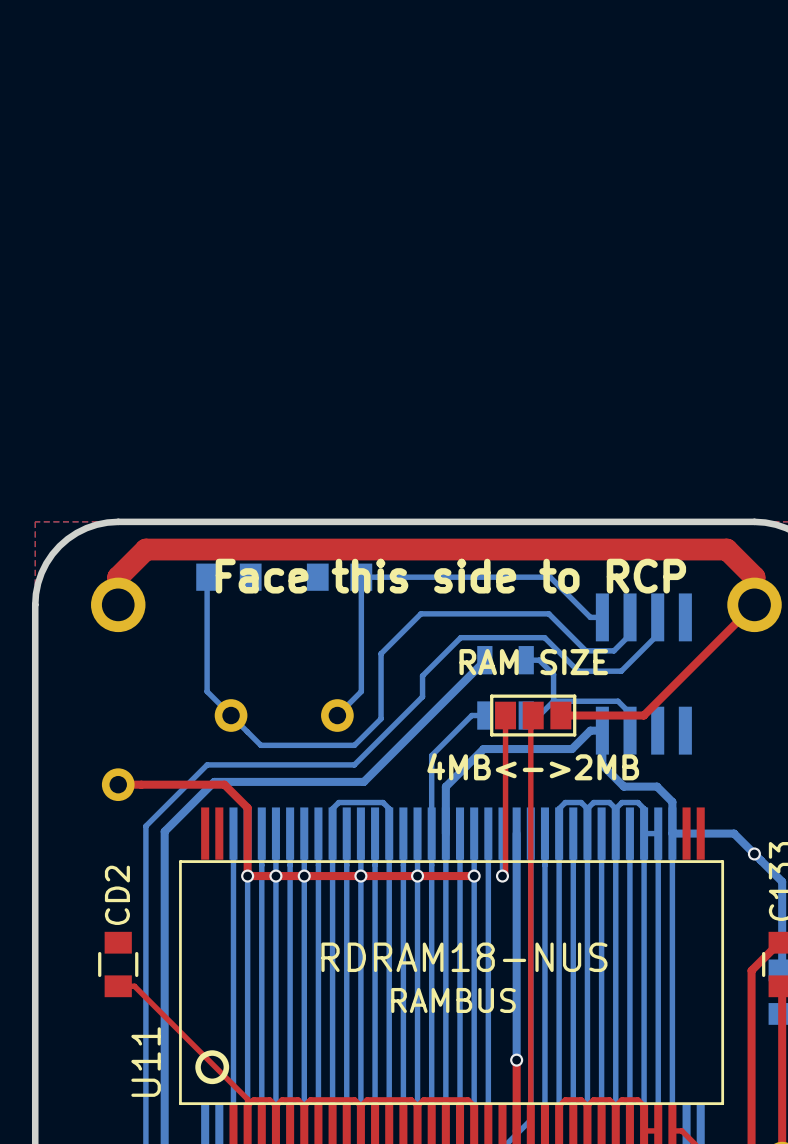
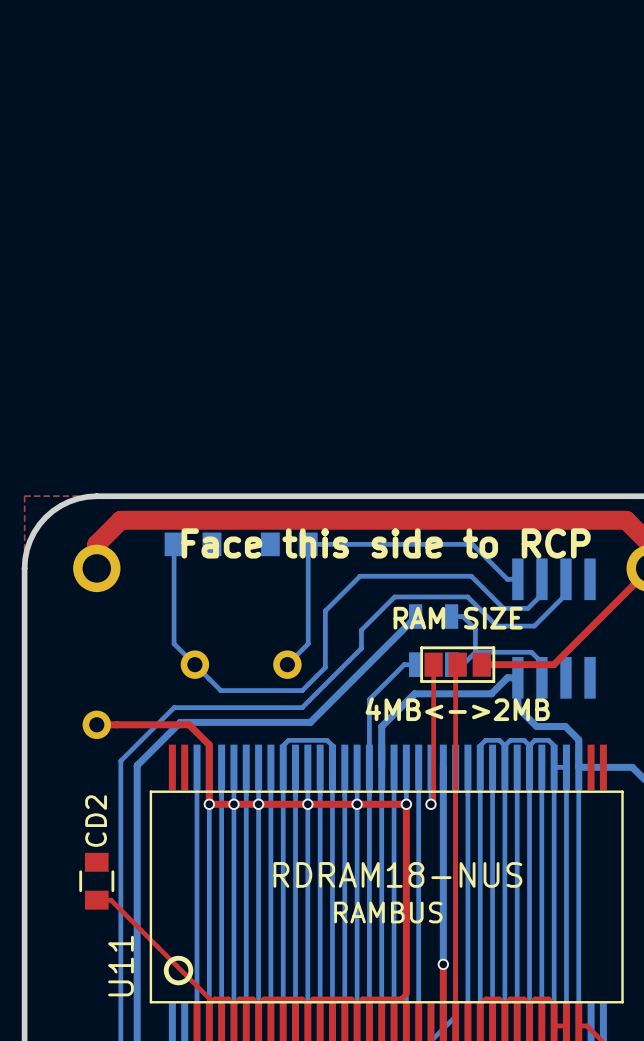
top track: none -> (406, 804) (406, 993) (400, 998)

